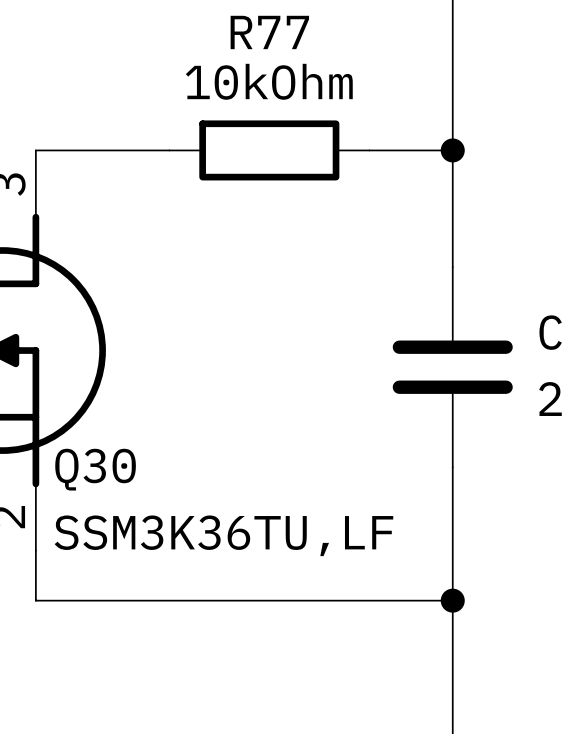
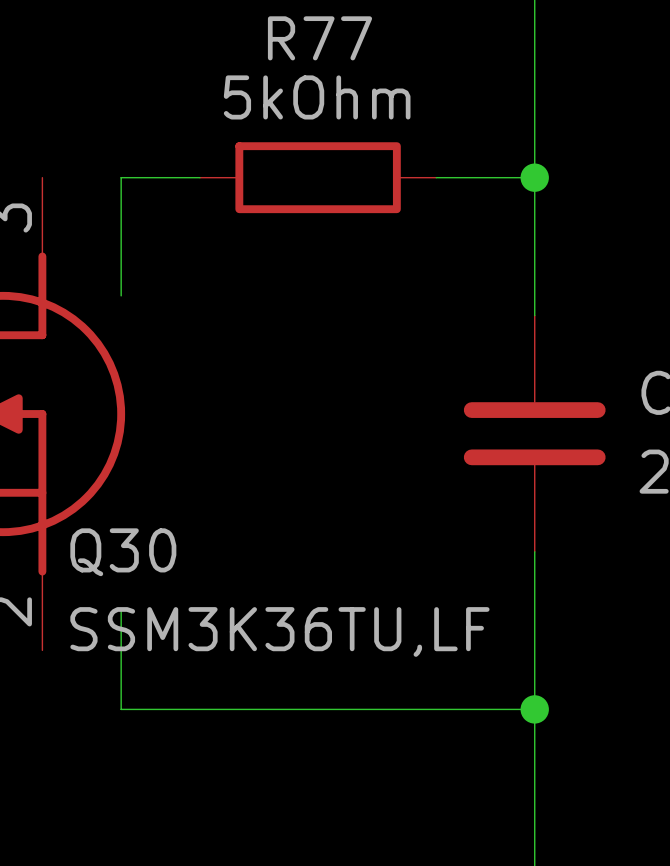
R77 value: 10kOhm (269, 81) -> 5kOhm (317, 97)
wire: (35, 150) (102, 150) -> (121, 295) (121, 177)
wire: (35, 550) (35, 600) (102, 600) -> (121, 610) (121, 709)

